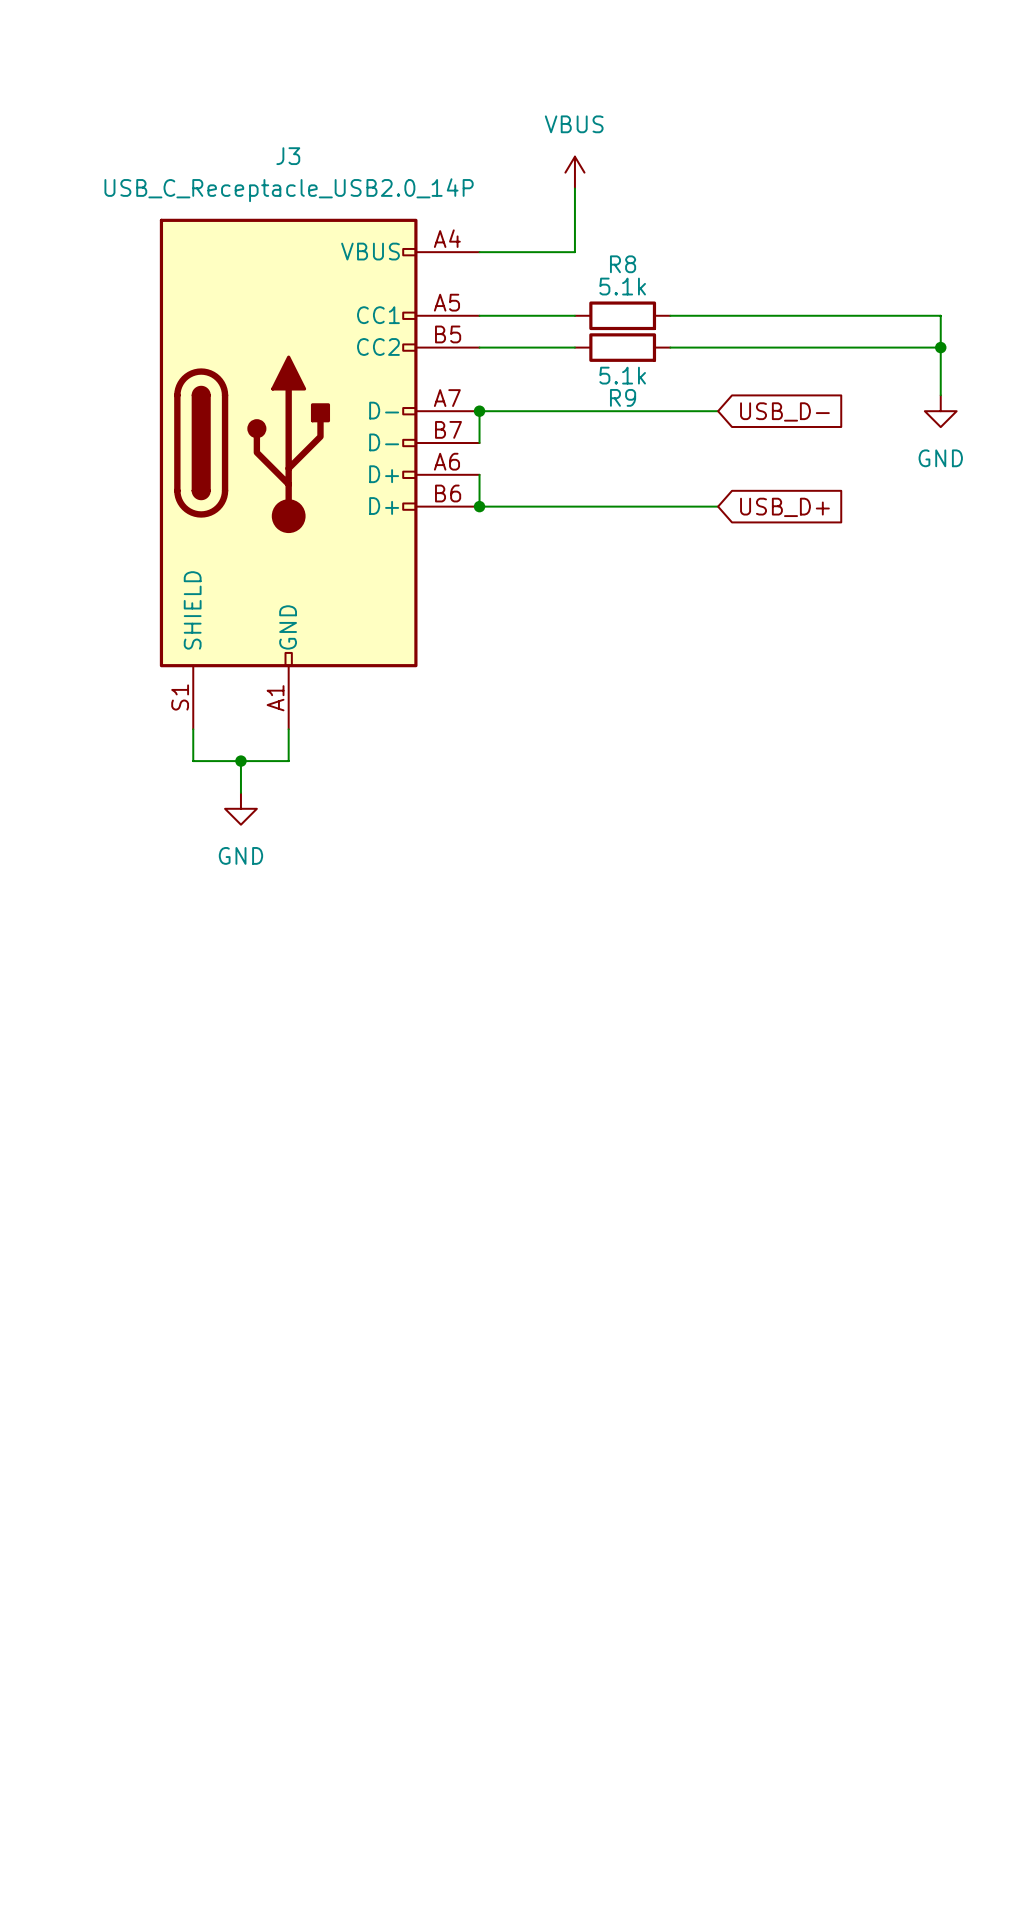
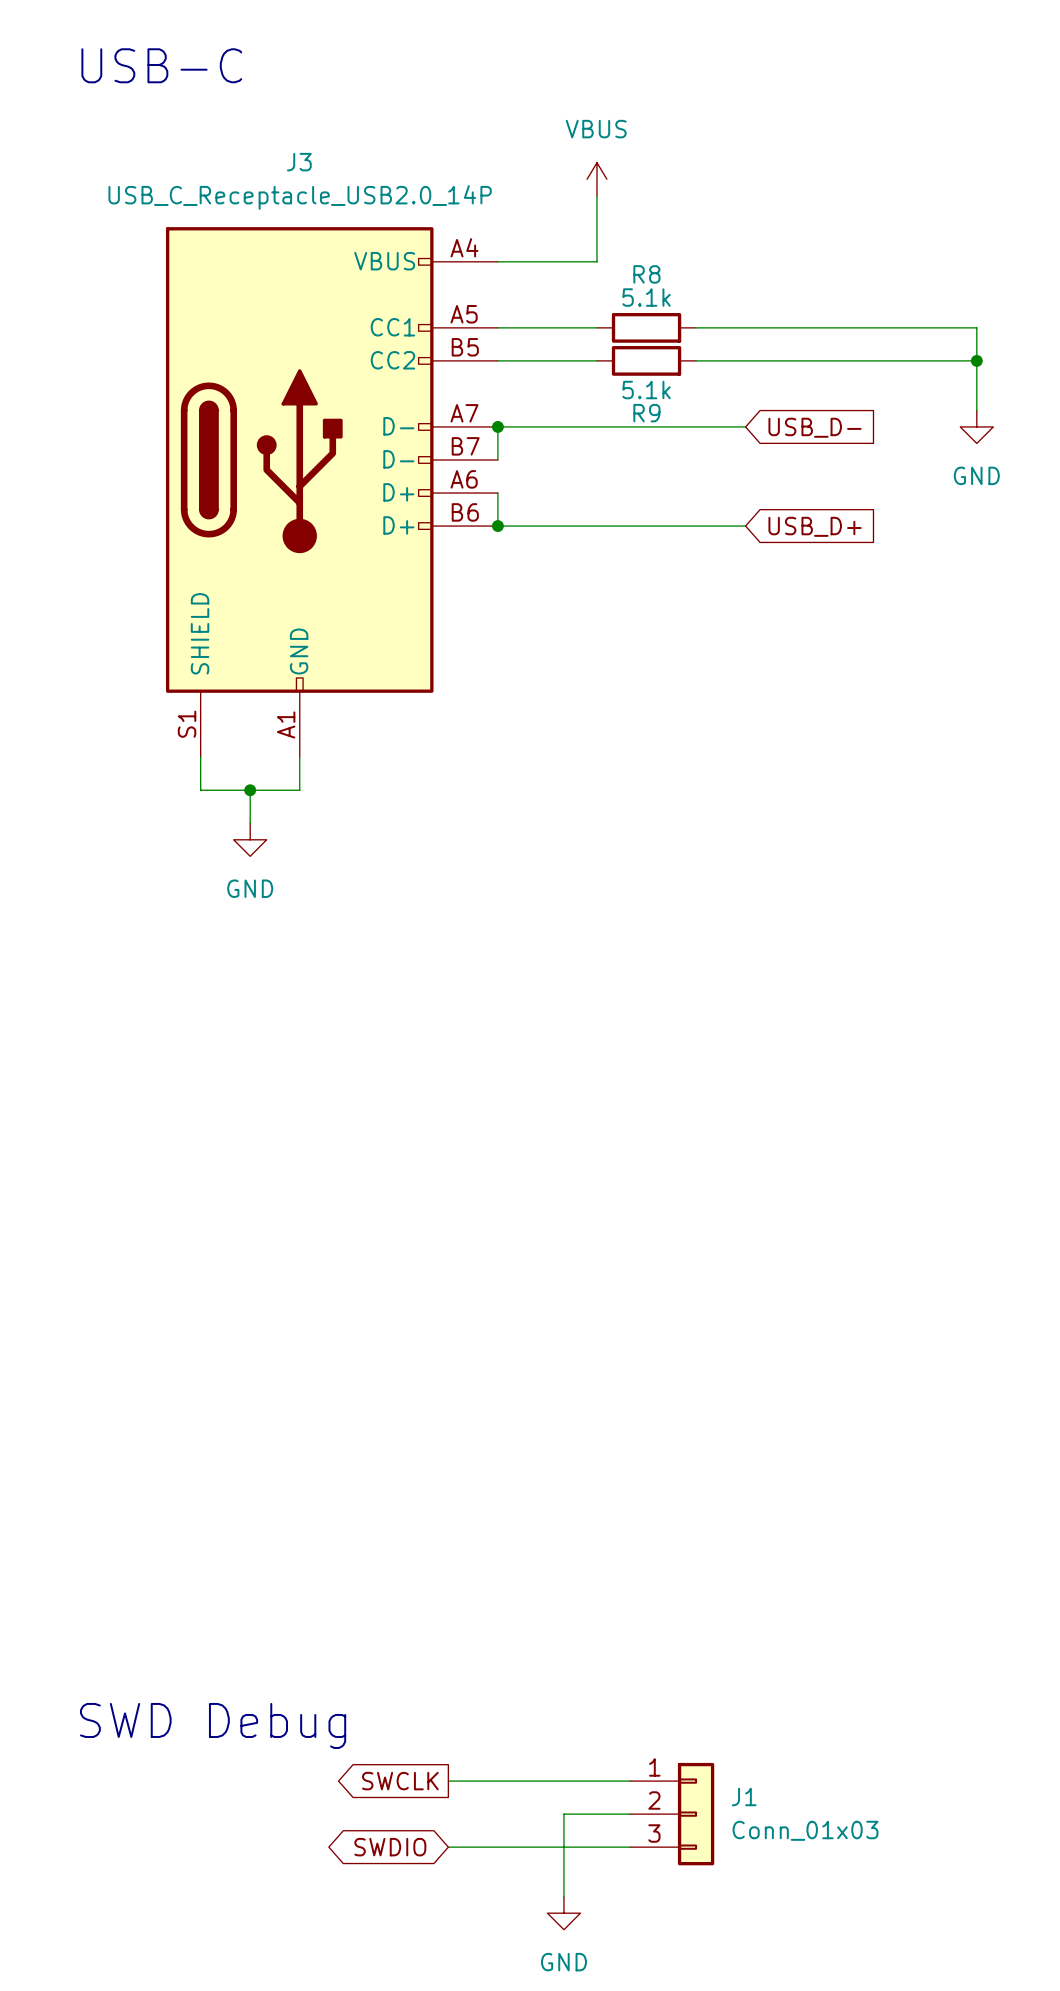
text: none -> USB-C (161, 65)
text: none -> SWD Debug (213, 1725)
global label: none -> SWCLK (400, 1781)
wire: none -> (448, 1781) (630, 1781)
wire: none -> (630, 1814) (563, 1814) (563, 1896)
J1: none -> Conn_01x03 (672, 1814)
global label: none -> SWDIO (390, 1847)
wire: none -> (448, 1847) (630, 1847)
power symbol: none -> GND (563, 1913)

